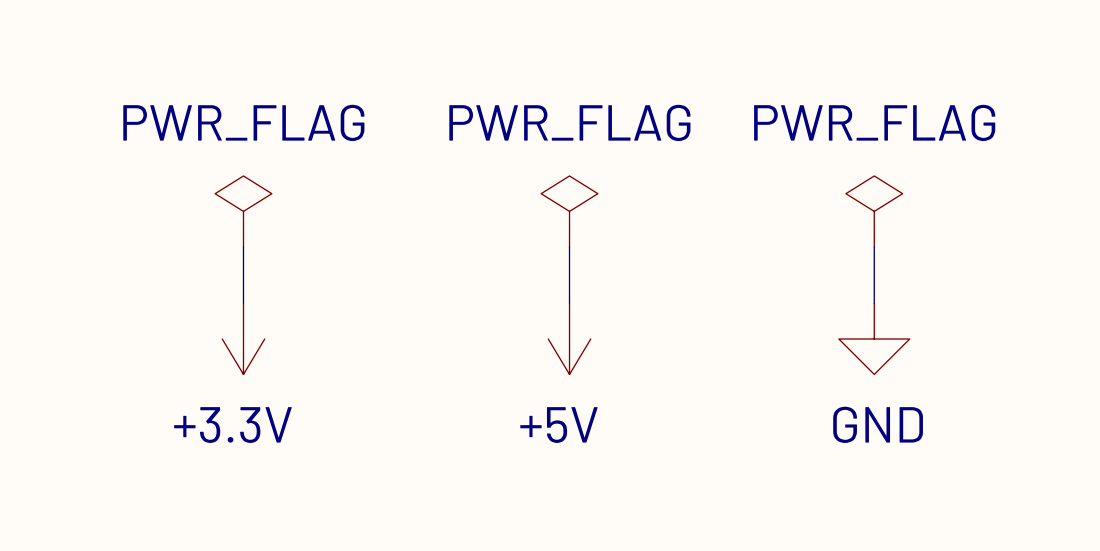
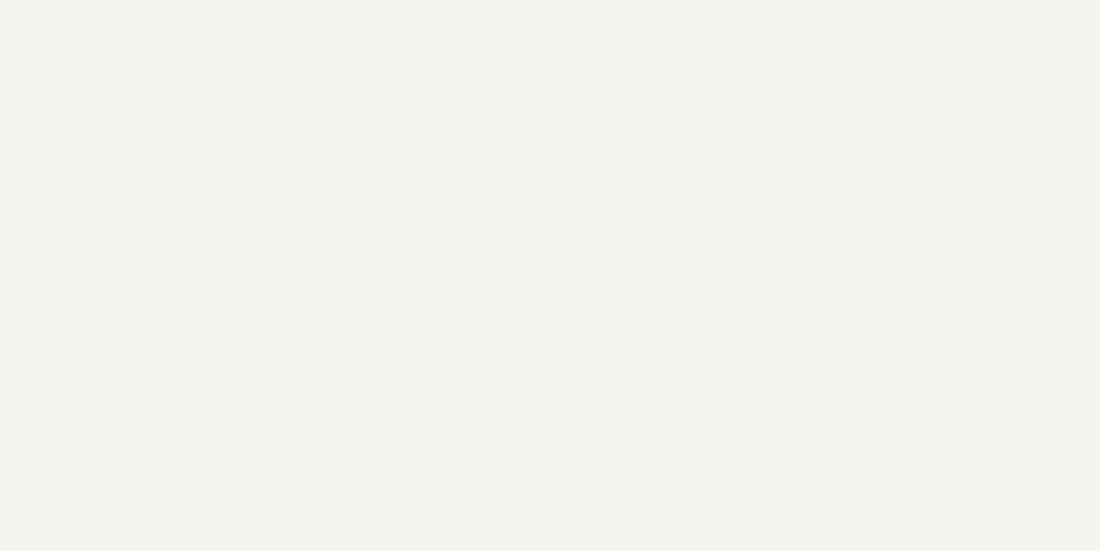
power symbol: PWR_FLAG (243, 211) -> none
power symbol: PWR_FLAG (569, 211) -> none
power symbol: PWR_FLAG (874, 211) -> none
wire: (243, 246) (243, 303) -> none
wire: (569, 246) (569, 303) -> none
wire: (874, 246) (874, 303) -> none
power symbol: +3.3V (243, 338) -> none
power symbol: +5V (569, 338) -> none
power symbol: GND (874, 338) -> none

